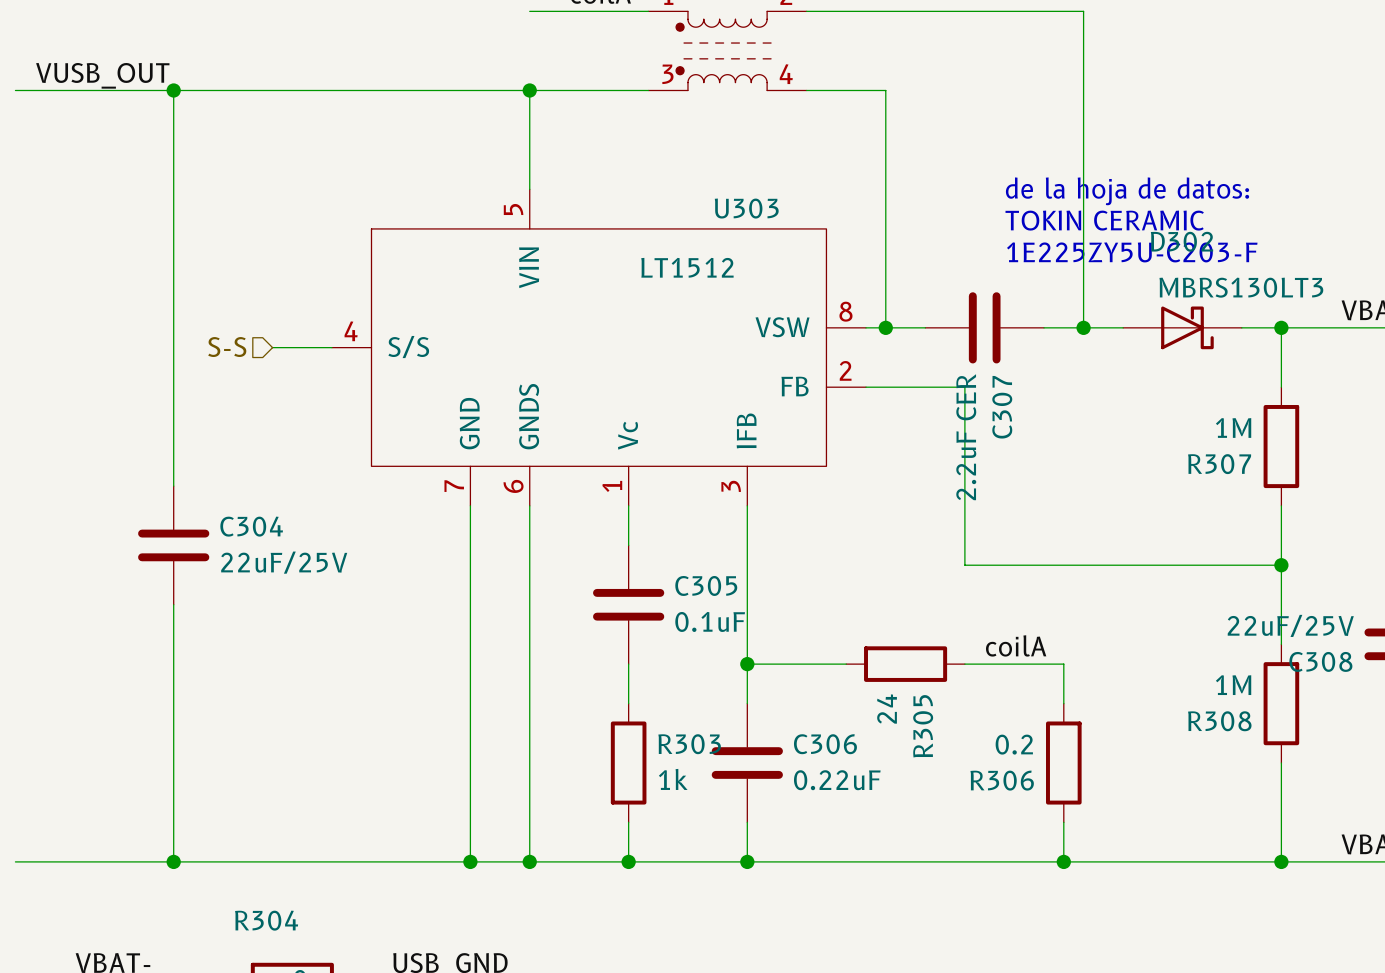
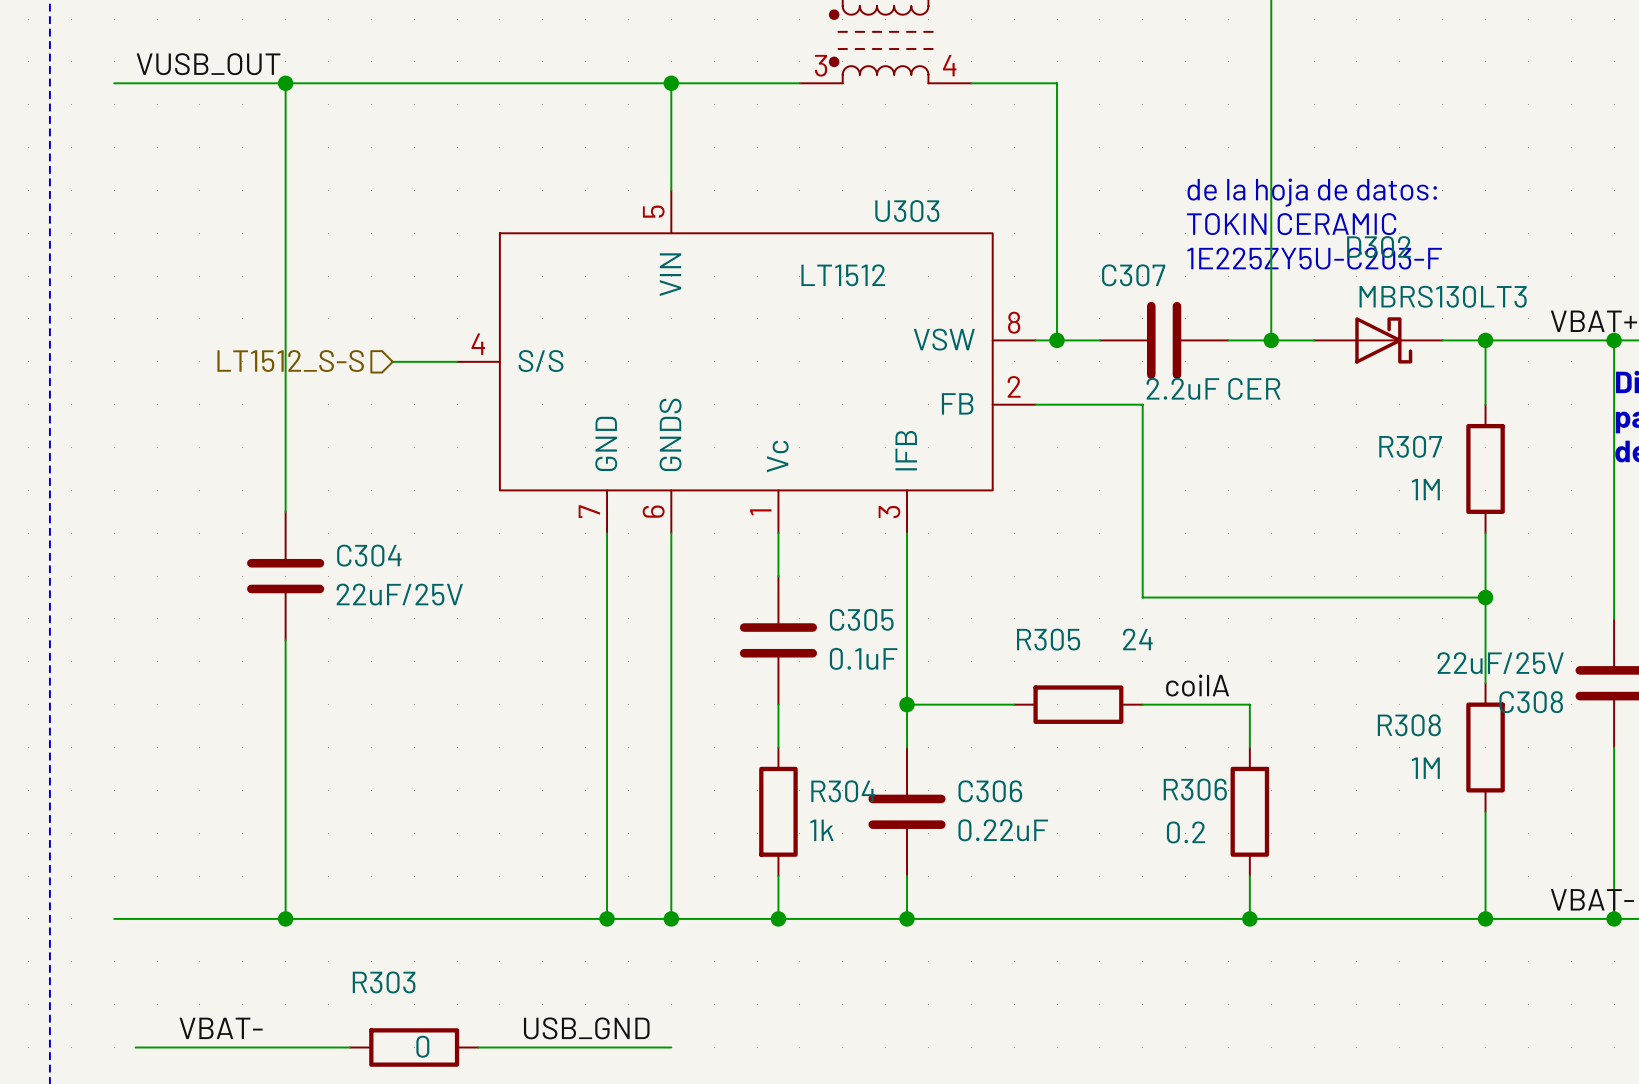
hierarchical label: S-S (227, 347) -> LT1512_S-S (290, 361)
C307 name rotation: 0° (1002, 407) -> 90° clockwise (1133, 275)
C307 name position: C307 (1002, 407) -> C307 (1133, 275)
R307 value position: 1M (1233, 427) -> 1M (1425, 489)
C307 value rotation: 0° (966, 437) -> 90° clockwise (1213, 388)
R307 name position: R307 (1219, 464) -> R307 (1410, 446)
R308 value position: 1M (1233, 685) -> 1M (1425, 768)
R305 value rotation: 0° (887, 709) -> 90° clockwise (1137, 639)
R305 value position: 24 (887, 709) -> 24 (1137, 639)
R308 name position: R308 (1219, 721) -> R308 (1409, 725)
R305 name rotation: 0° (923, 726) -> 90° clockwise (1048, 639)
R305 name position: R305 (923, 726) -> R305 (1048, 639)
R303 name: R303 (689, 744) -> R304 (843, 791)
R306 value position: 0.2 (1014, 744) -> 0.2 (1186, 832)
R306 name position: R306 (1002, 780) -> R306 (1195, 789)
R304 name: R304 (266, 920) -> R303 (384, 982)

